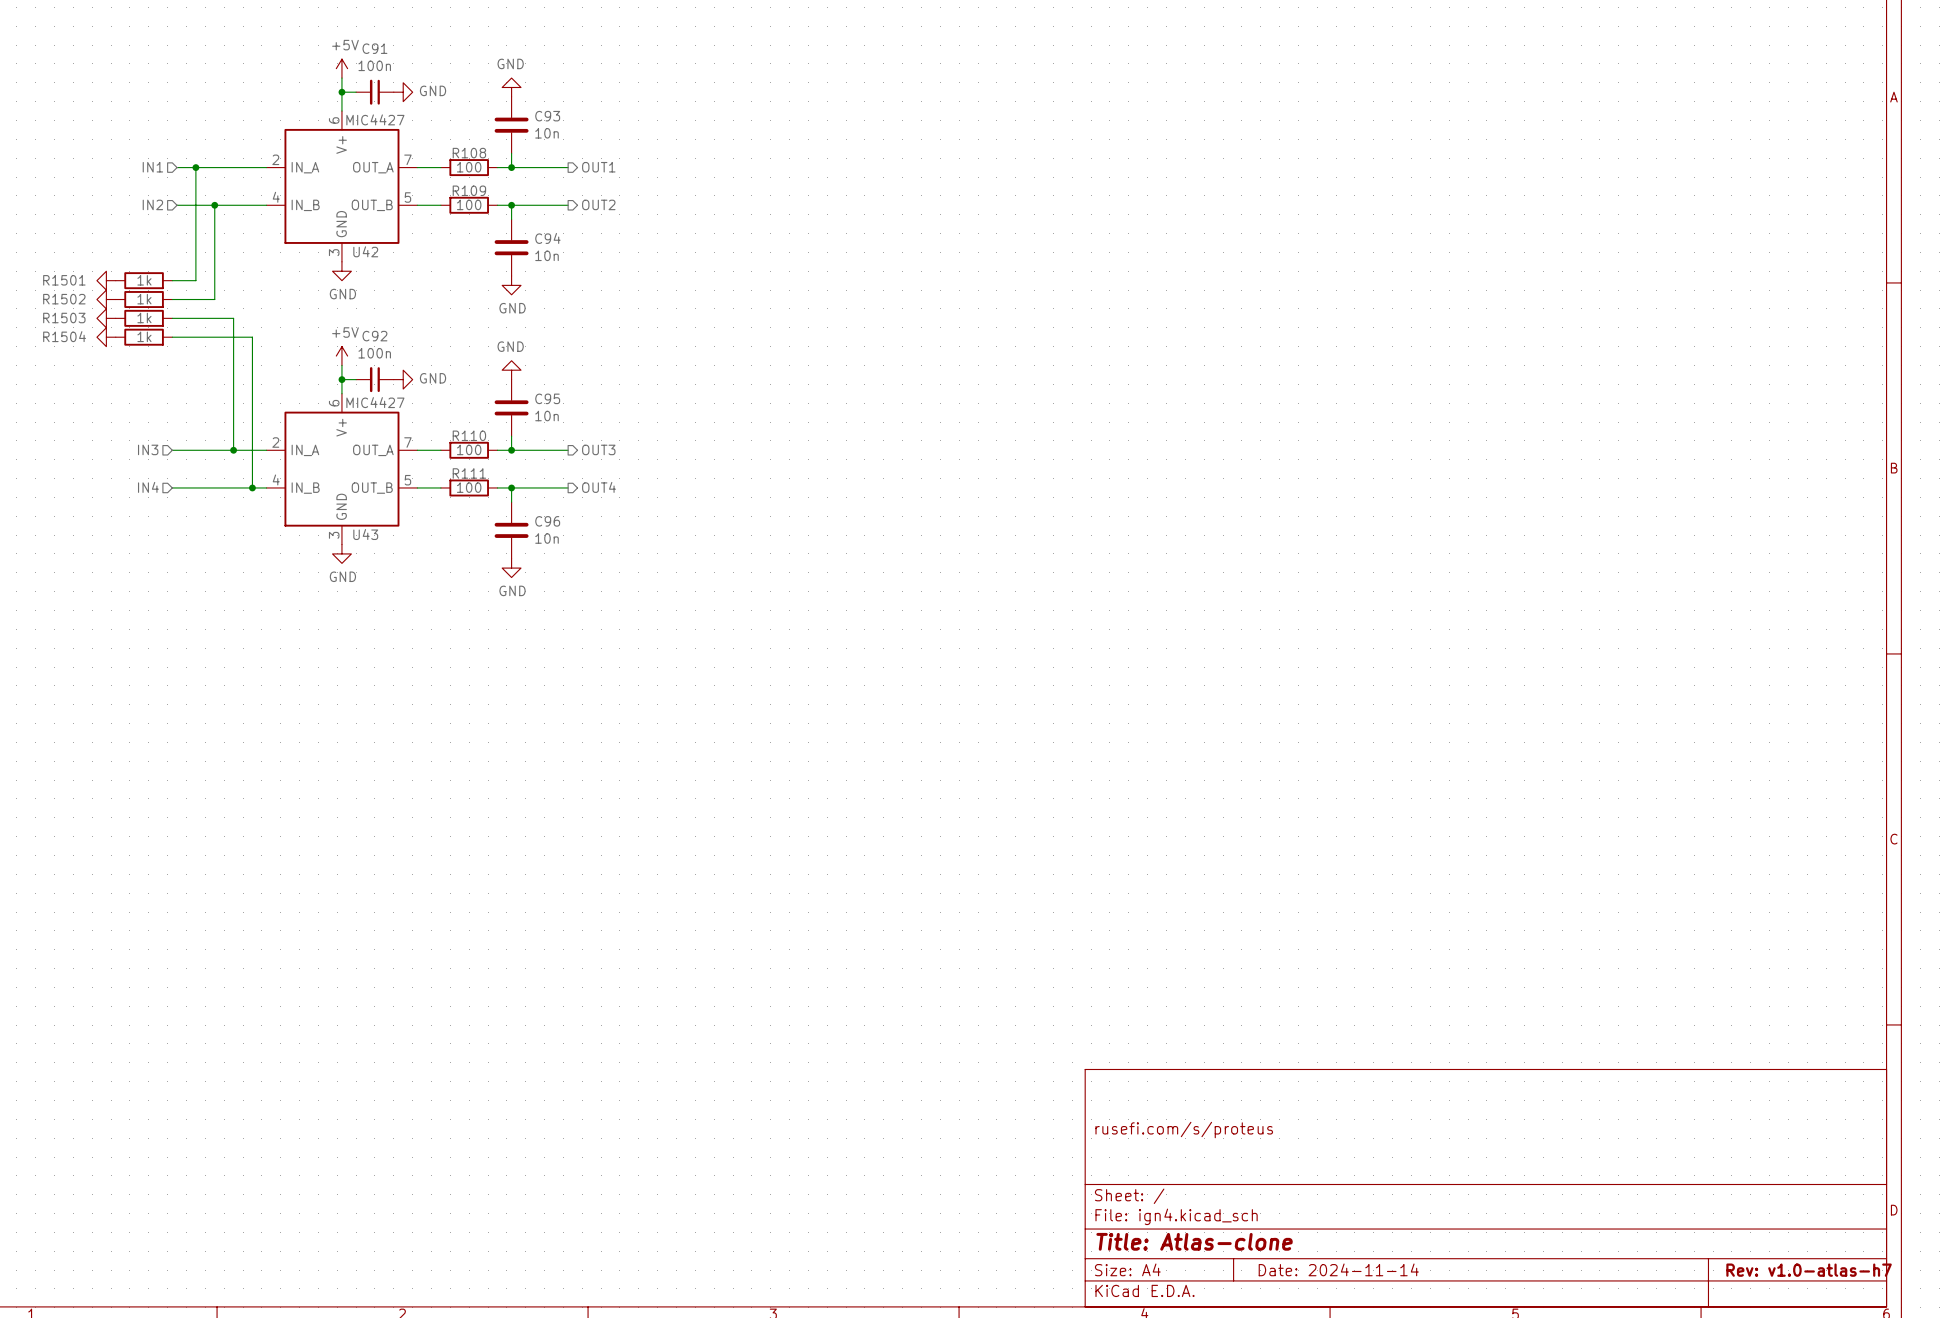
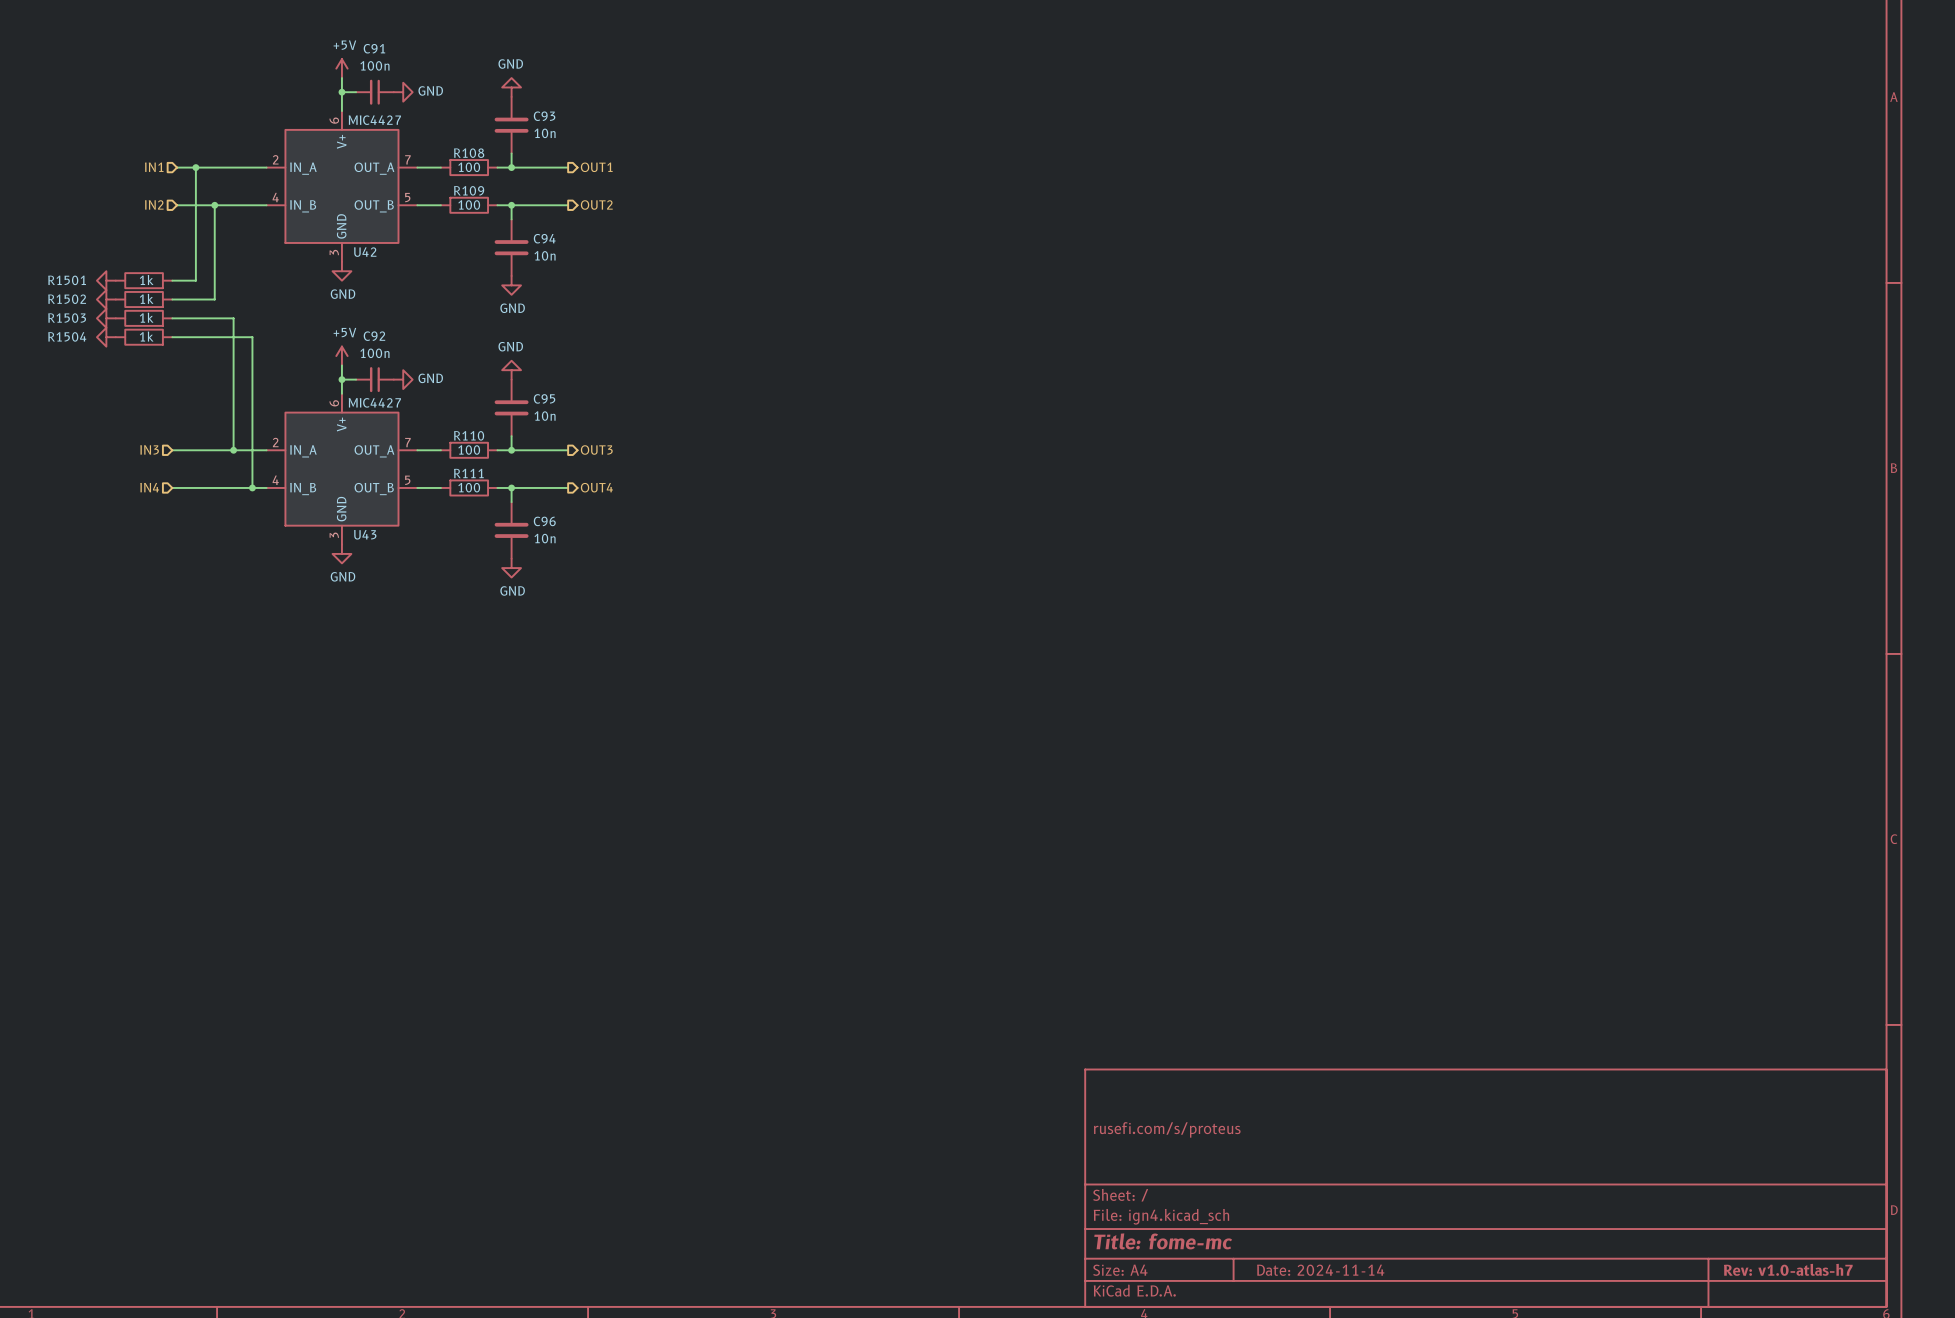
title block: Title: Atlas-clone (1194, 1241) -> Title: fome-mc (1163, 1241)

